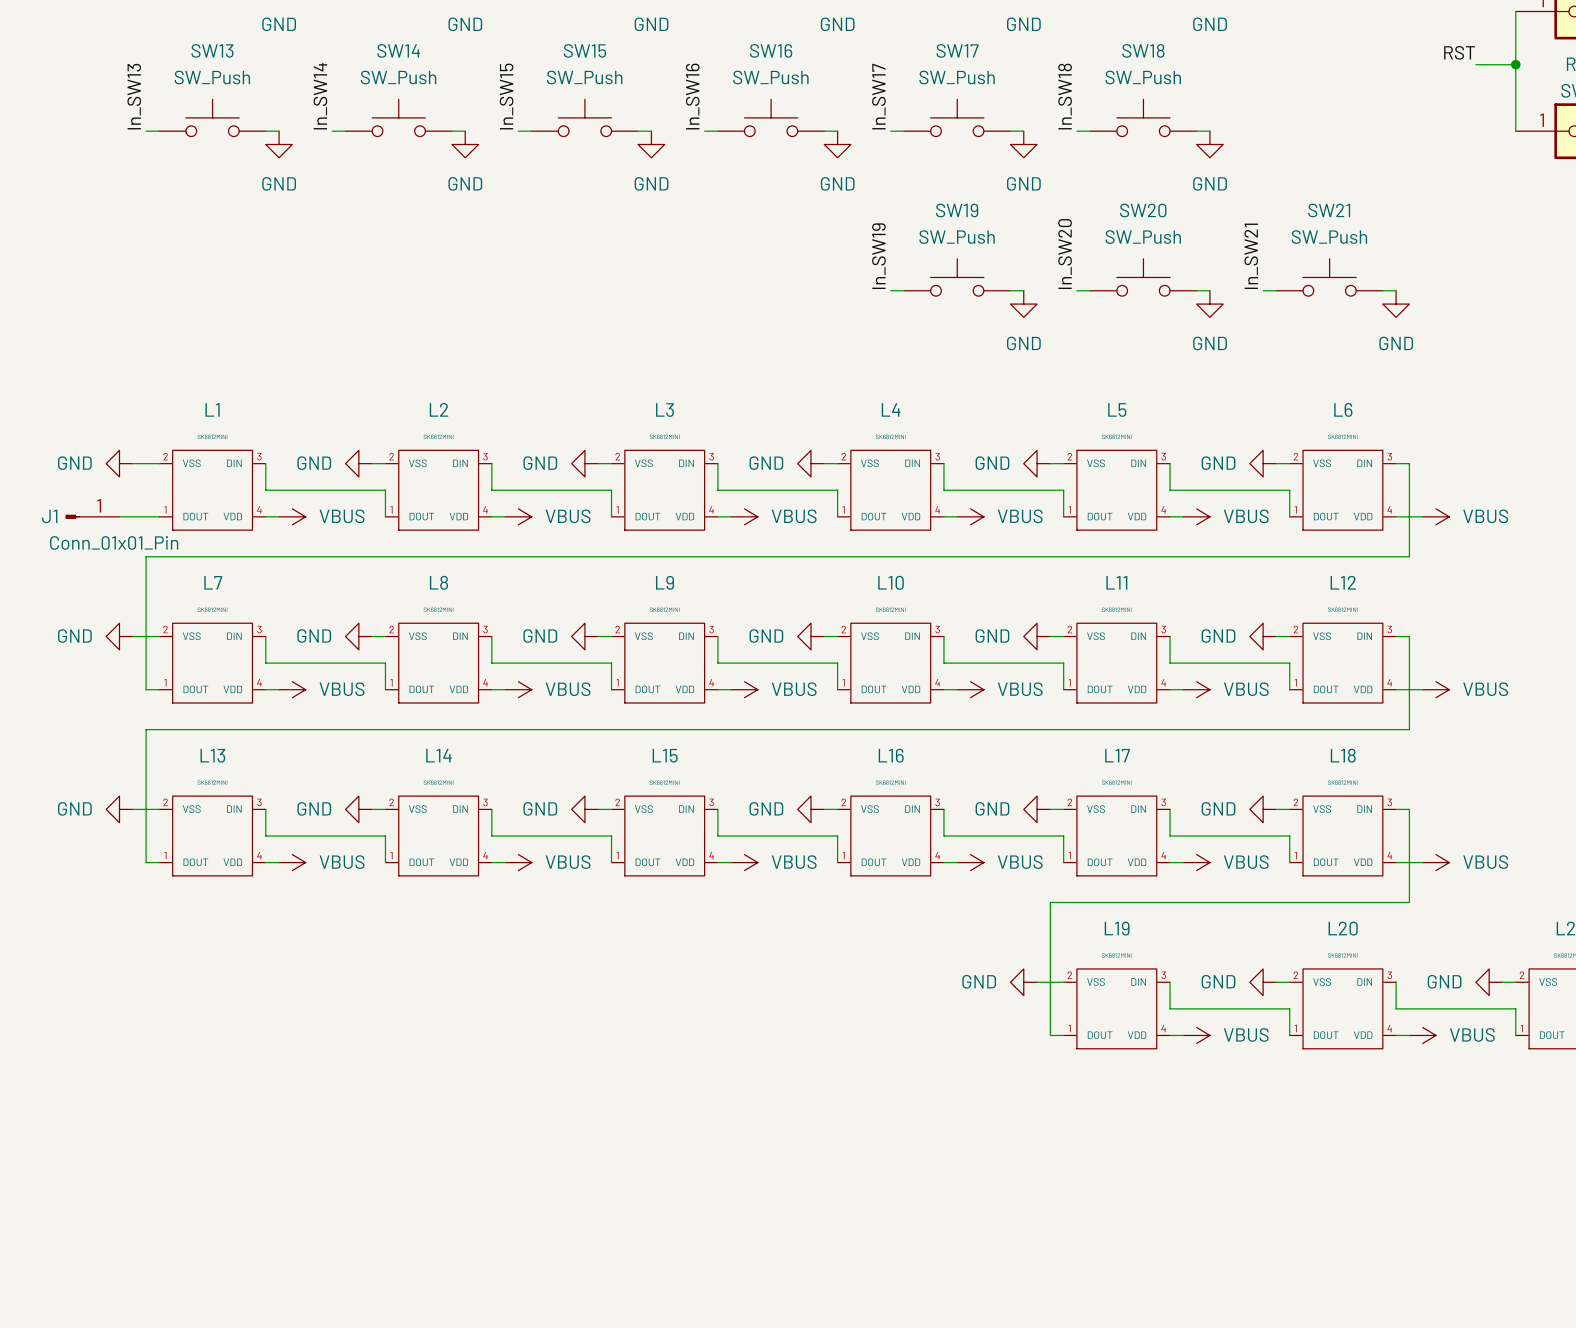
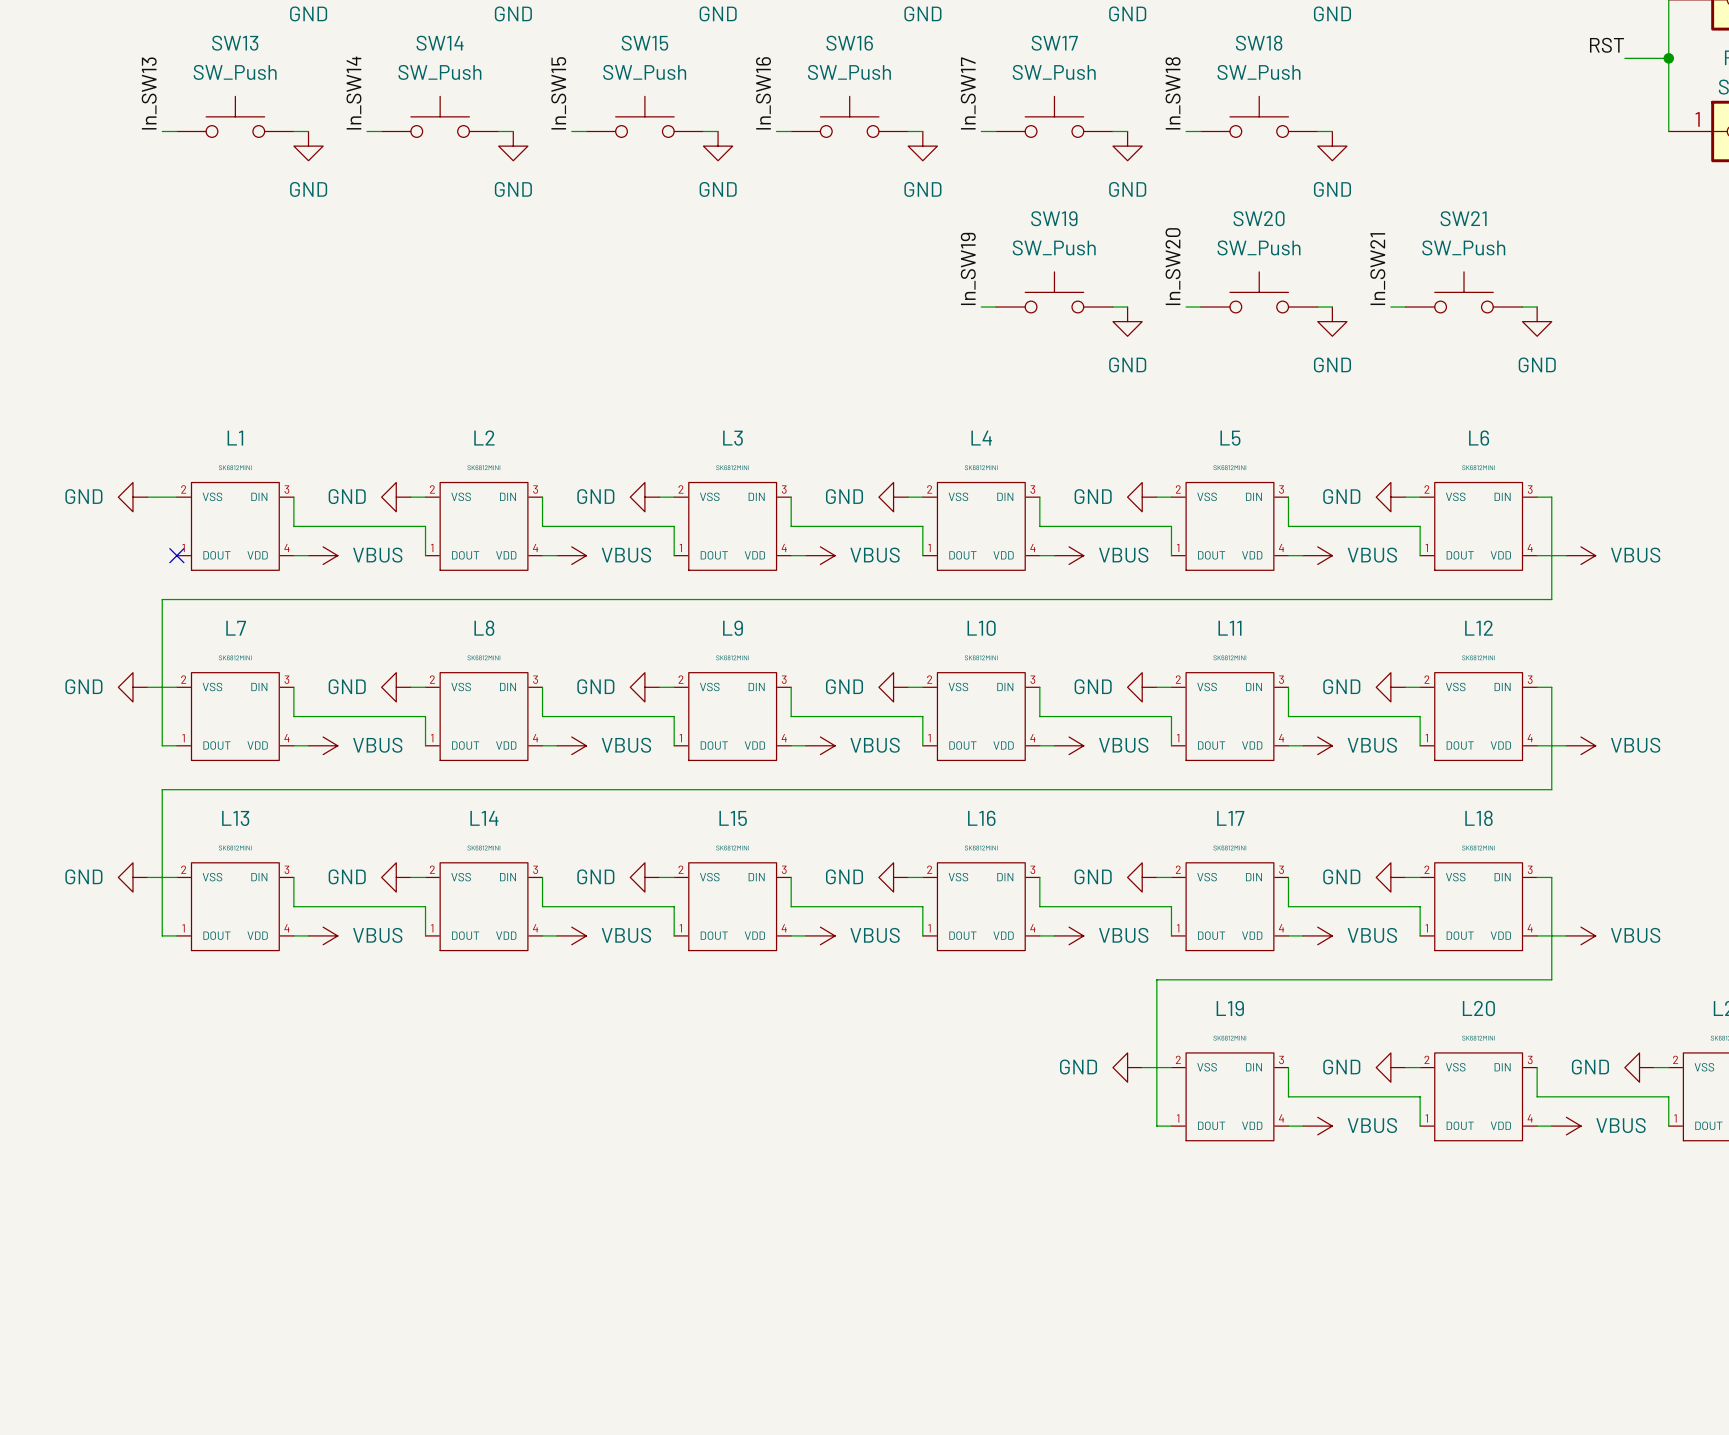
J1: Conn_01x01_Pin (92, 516) -> none
wire: (119, 516) (159, 516) -> none
no-connect mark: none -> (176, 555)

